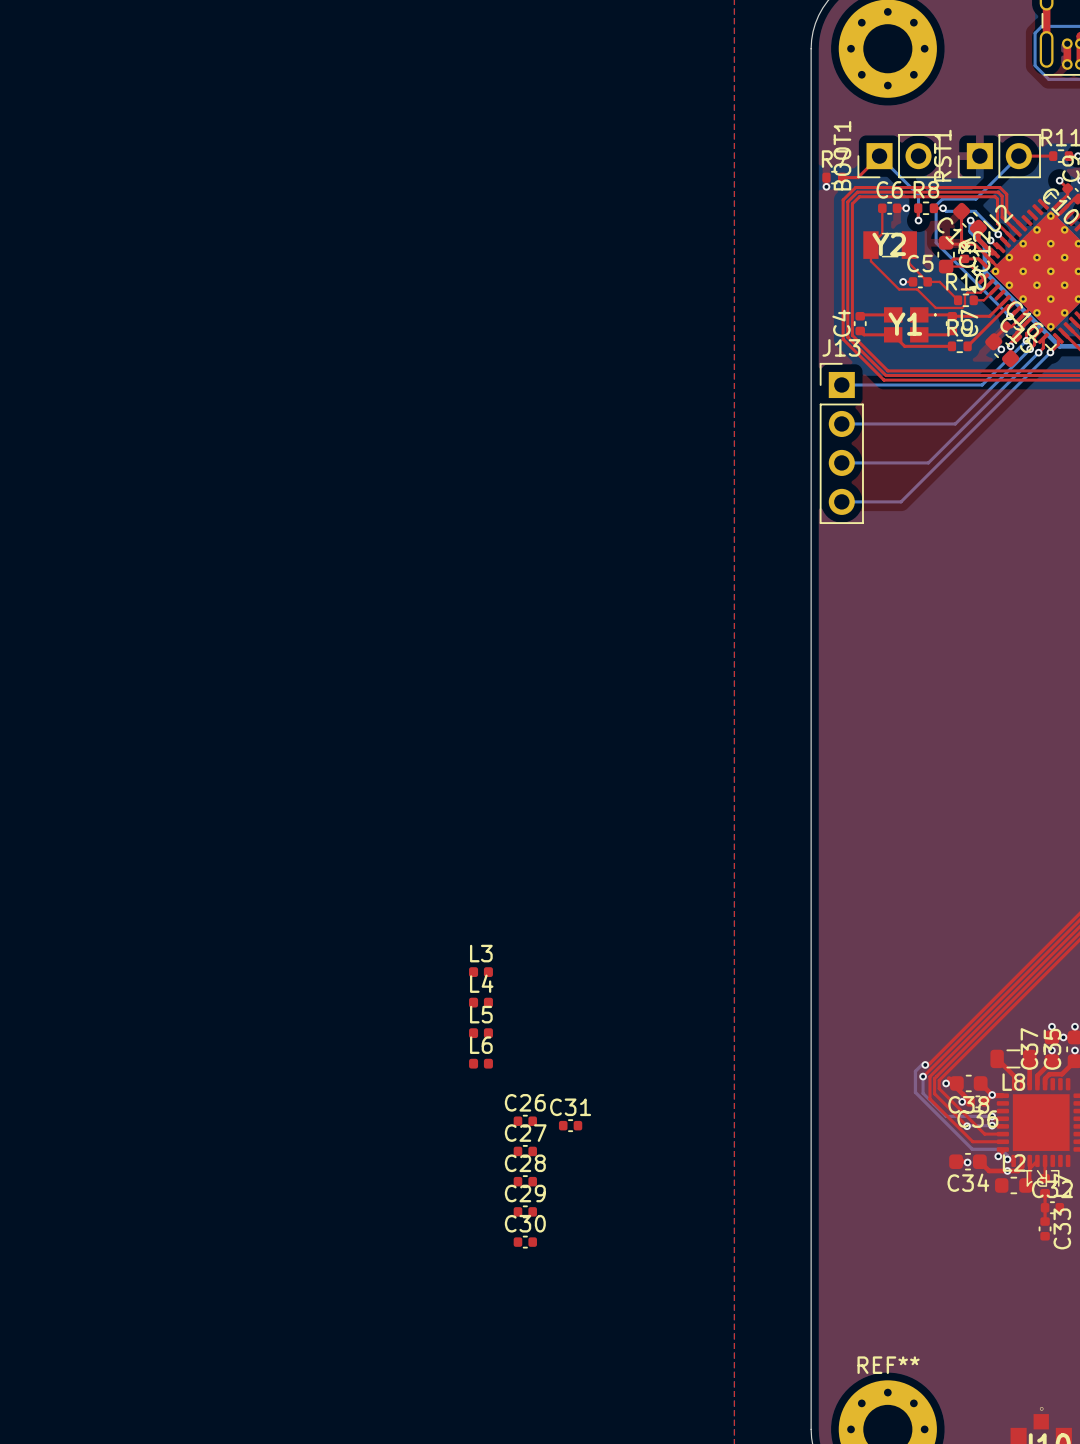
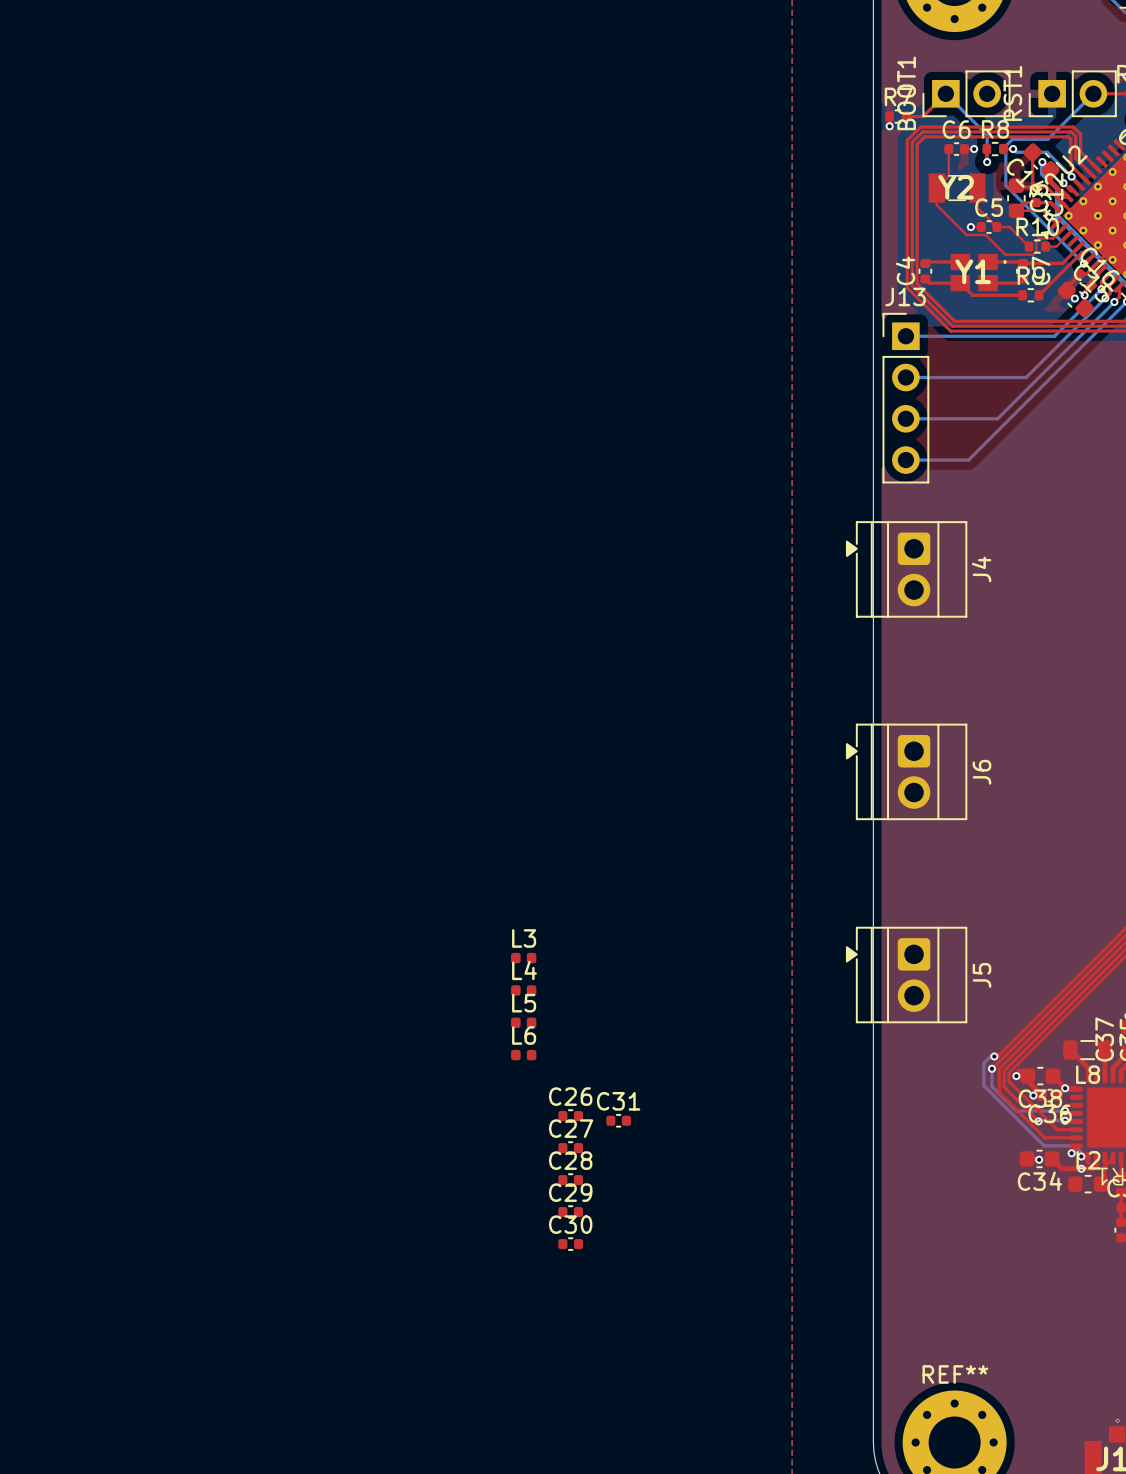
J4: none -> (906, 569)
J6: none -> (906, 771)
J5: none -> (906, 975)

